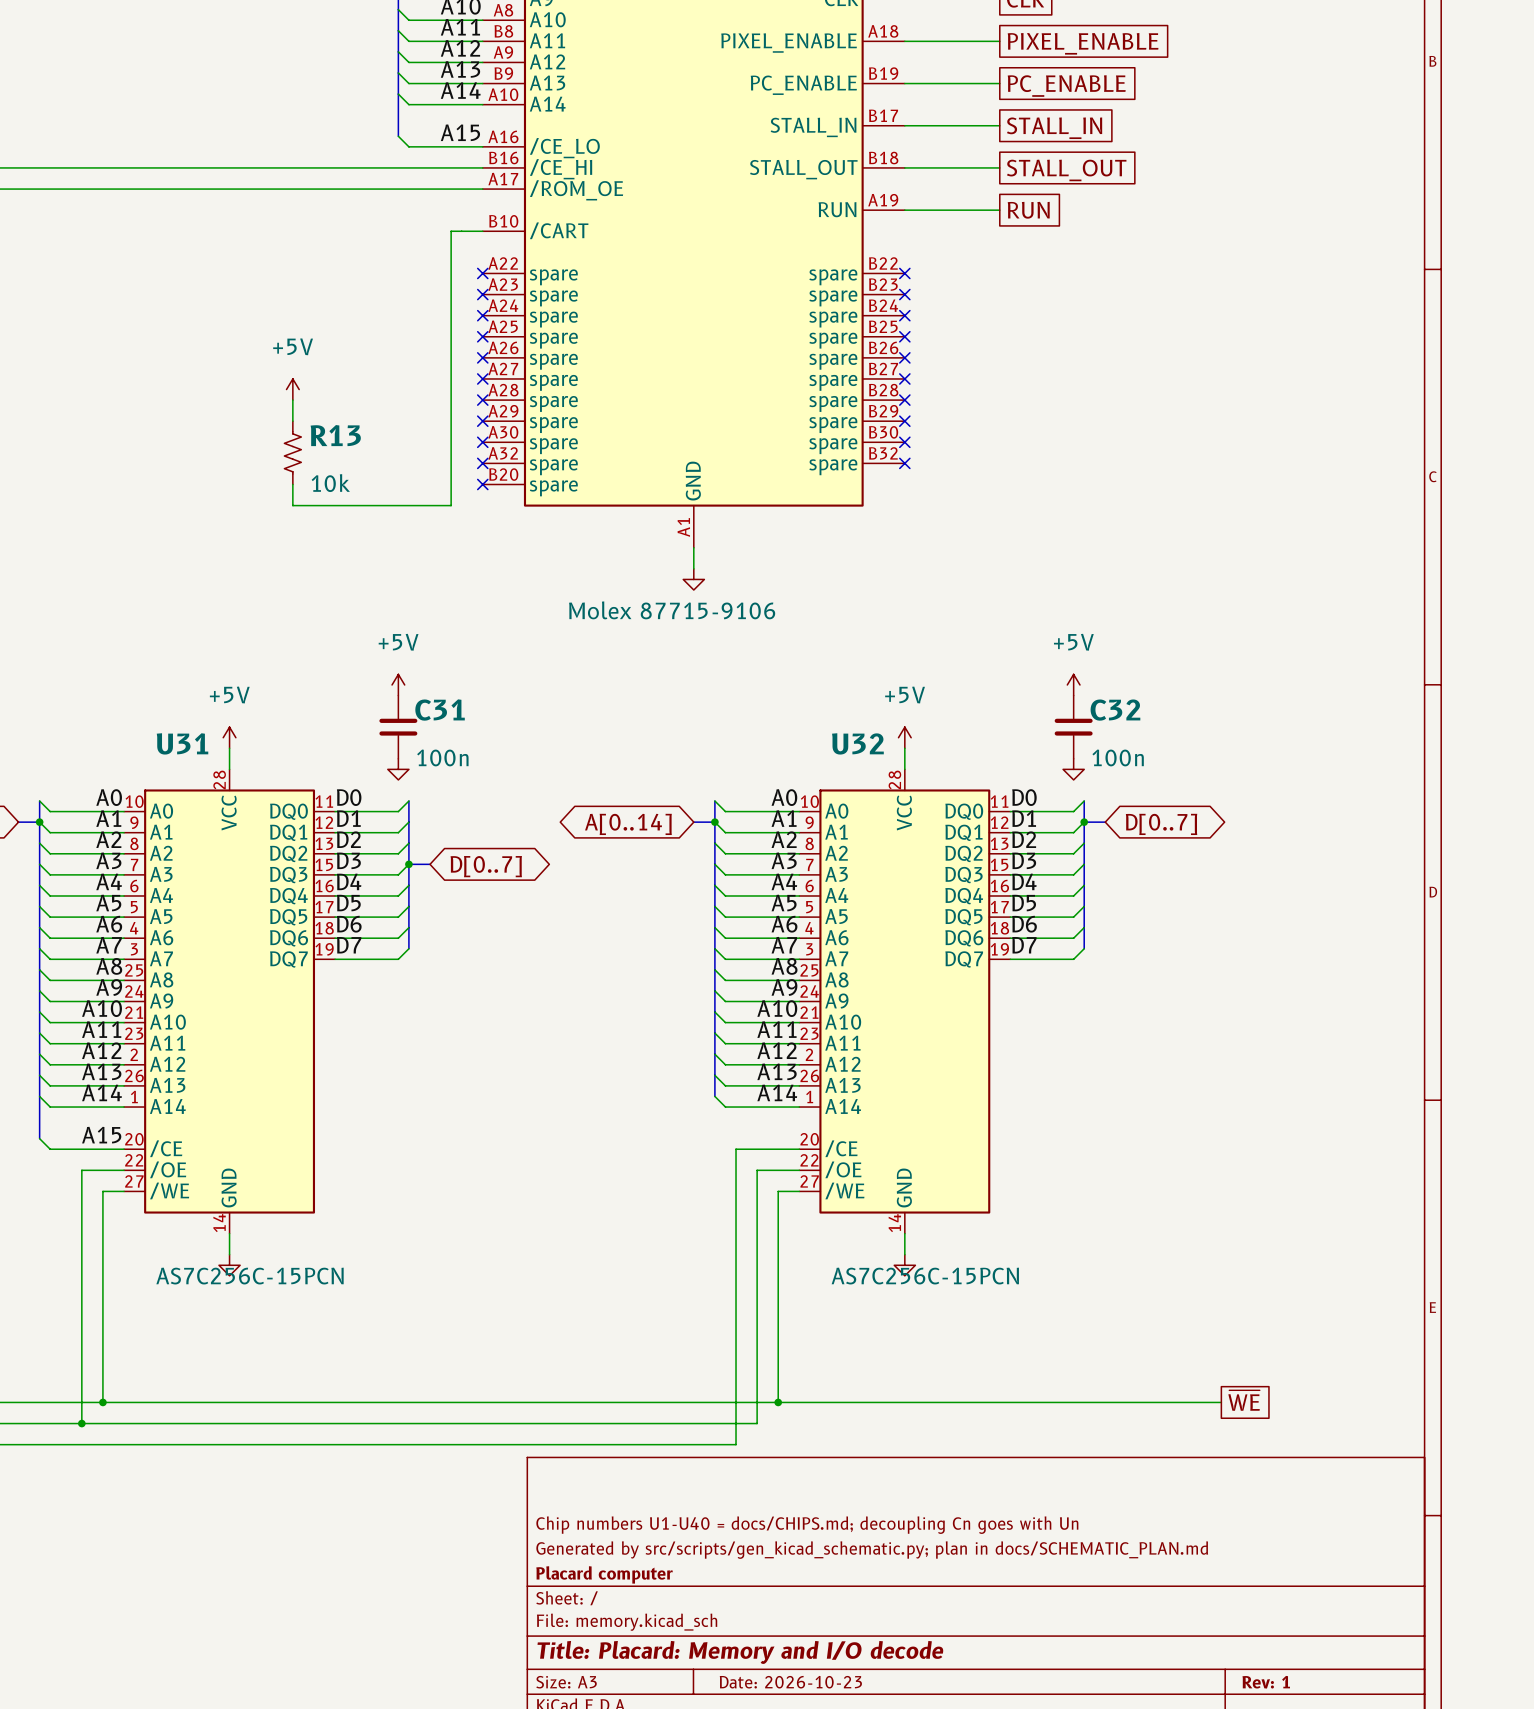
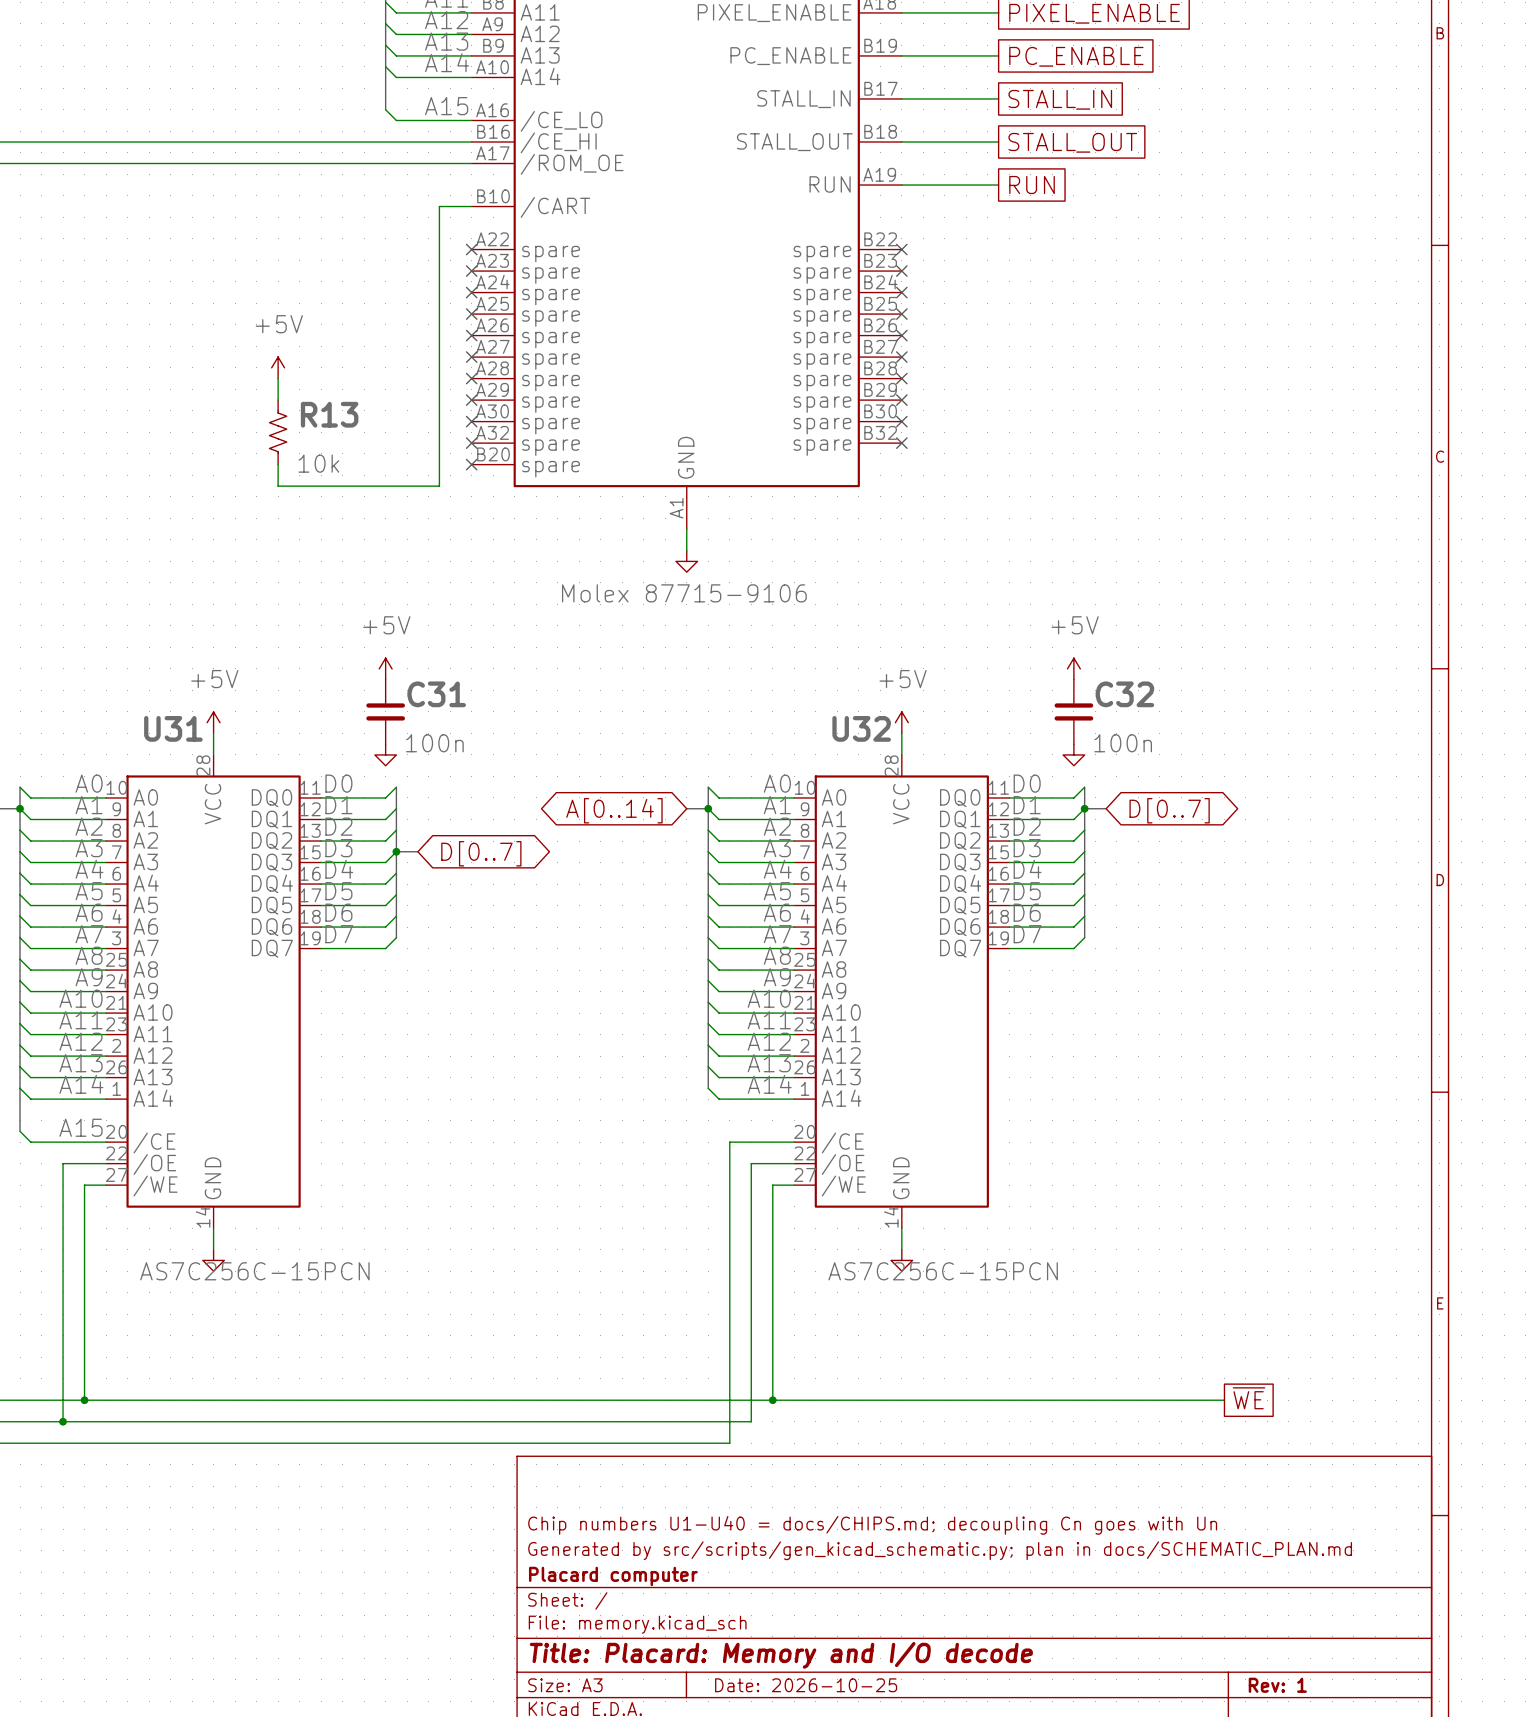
title block: Date: 2026-10-23 (790, 1682) -> Date: 2026-10-25 (806, 1685)

